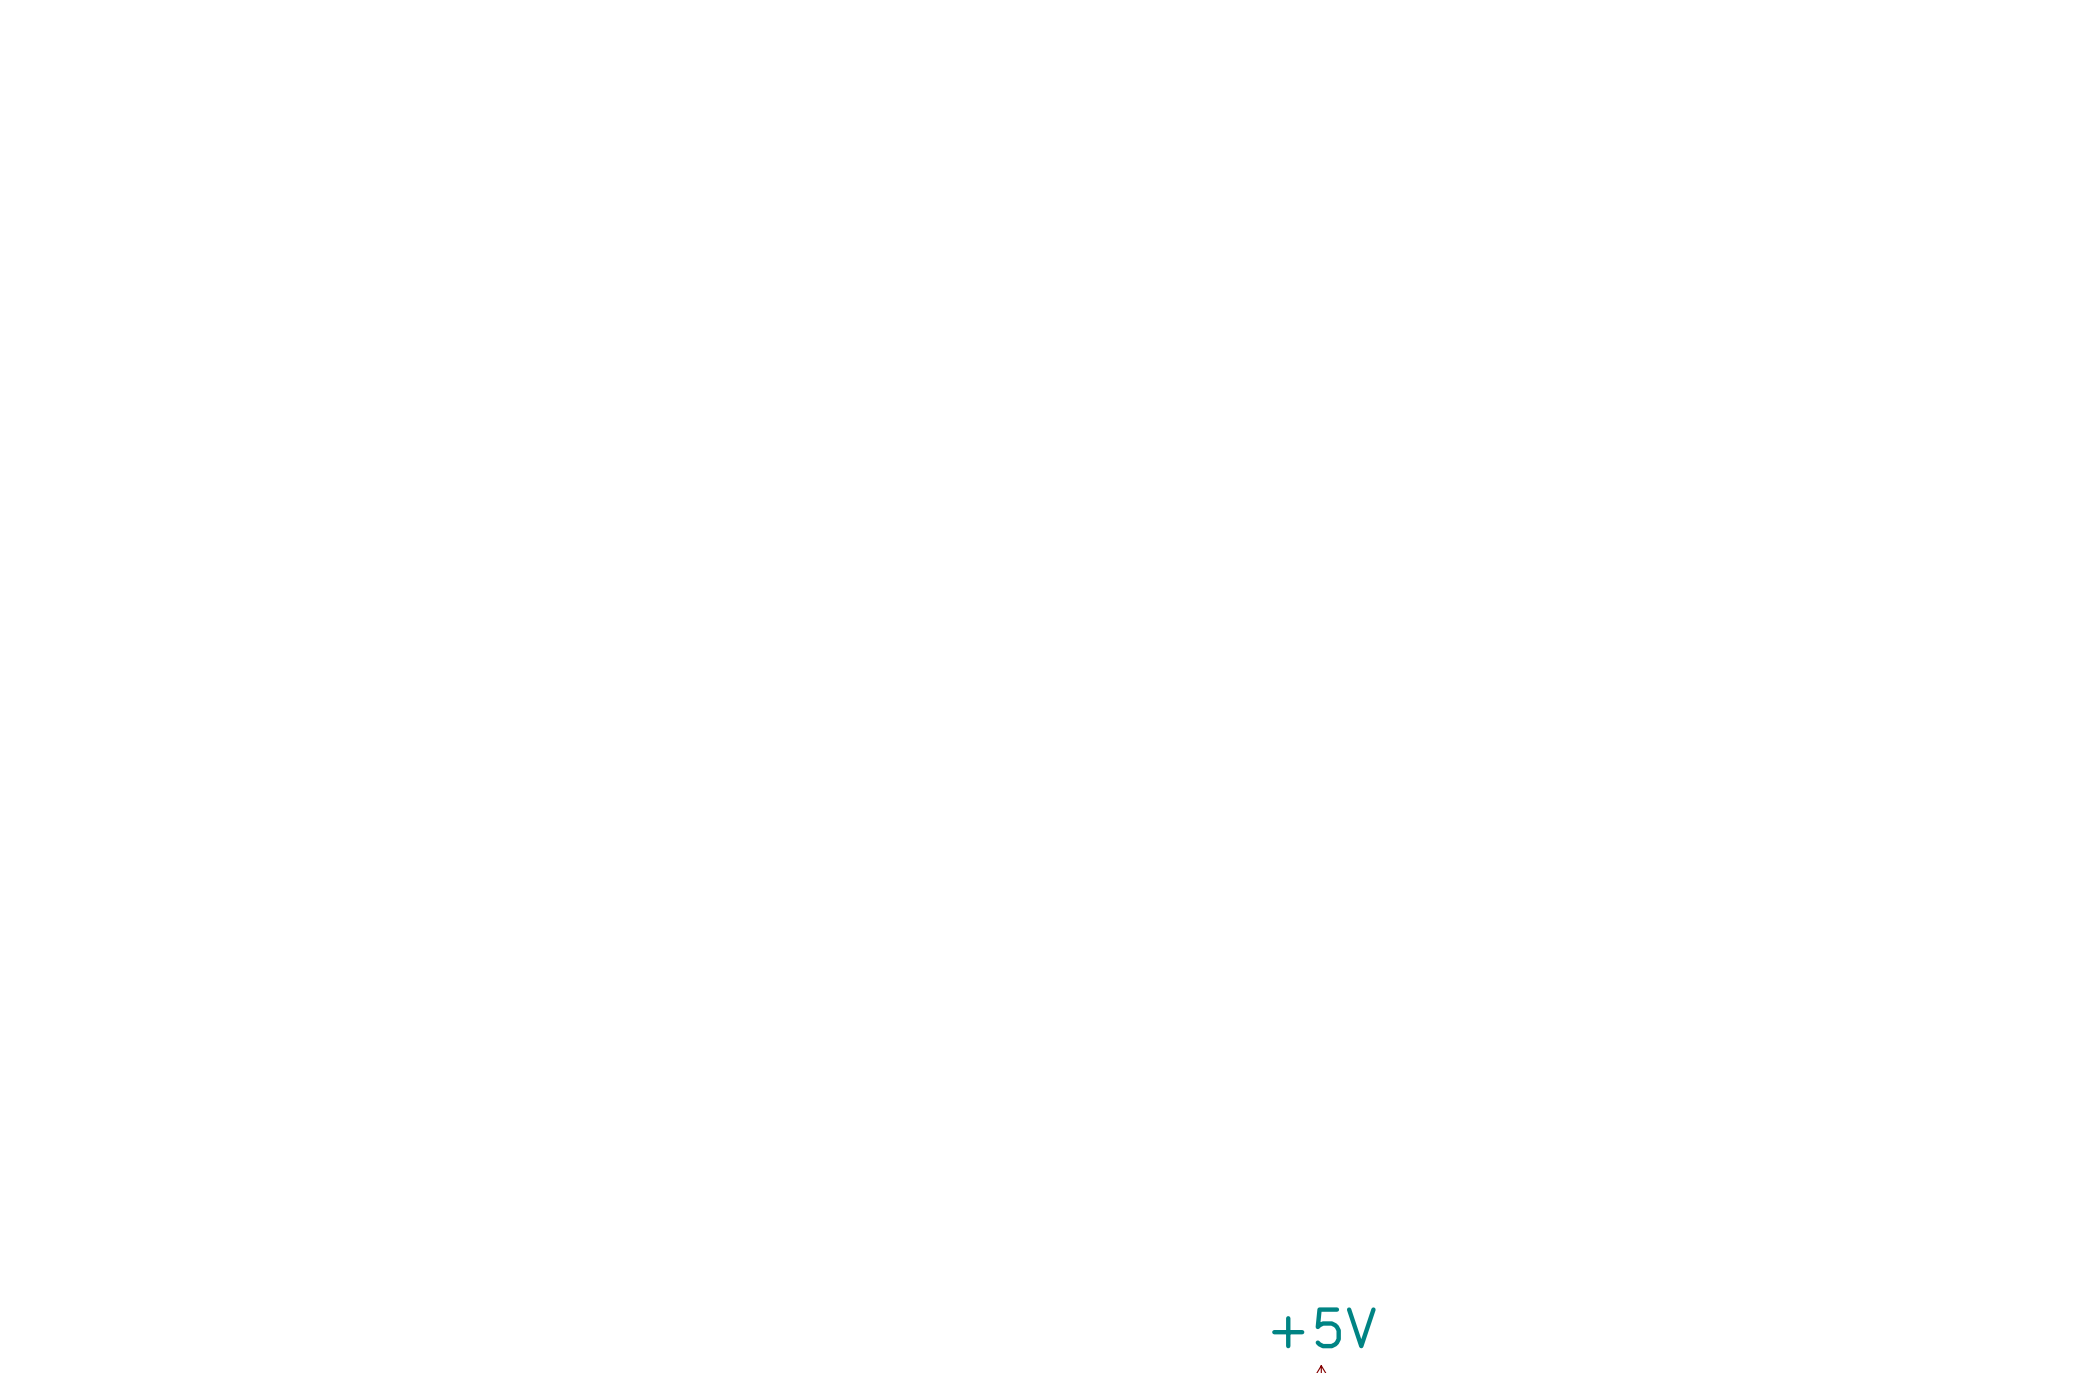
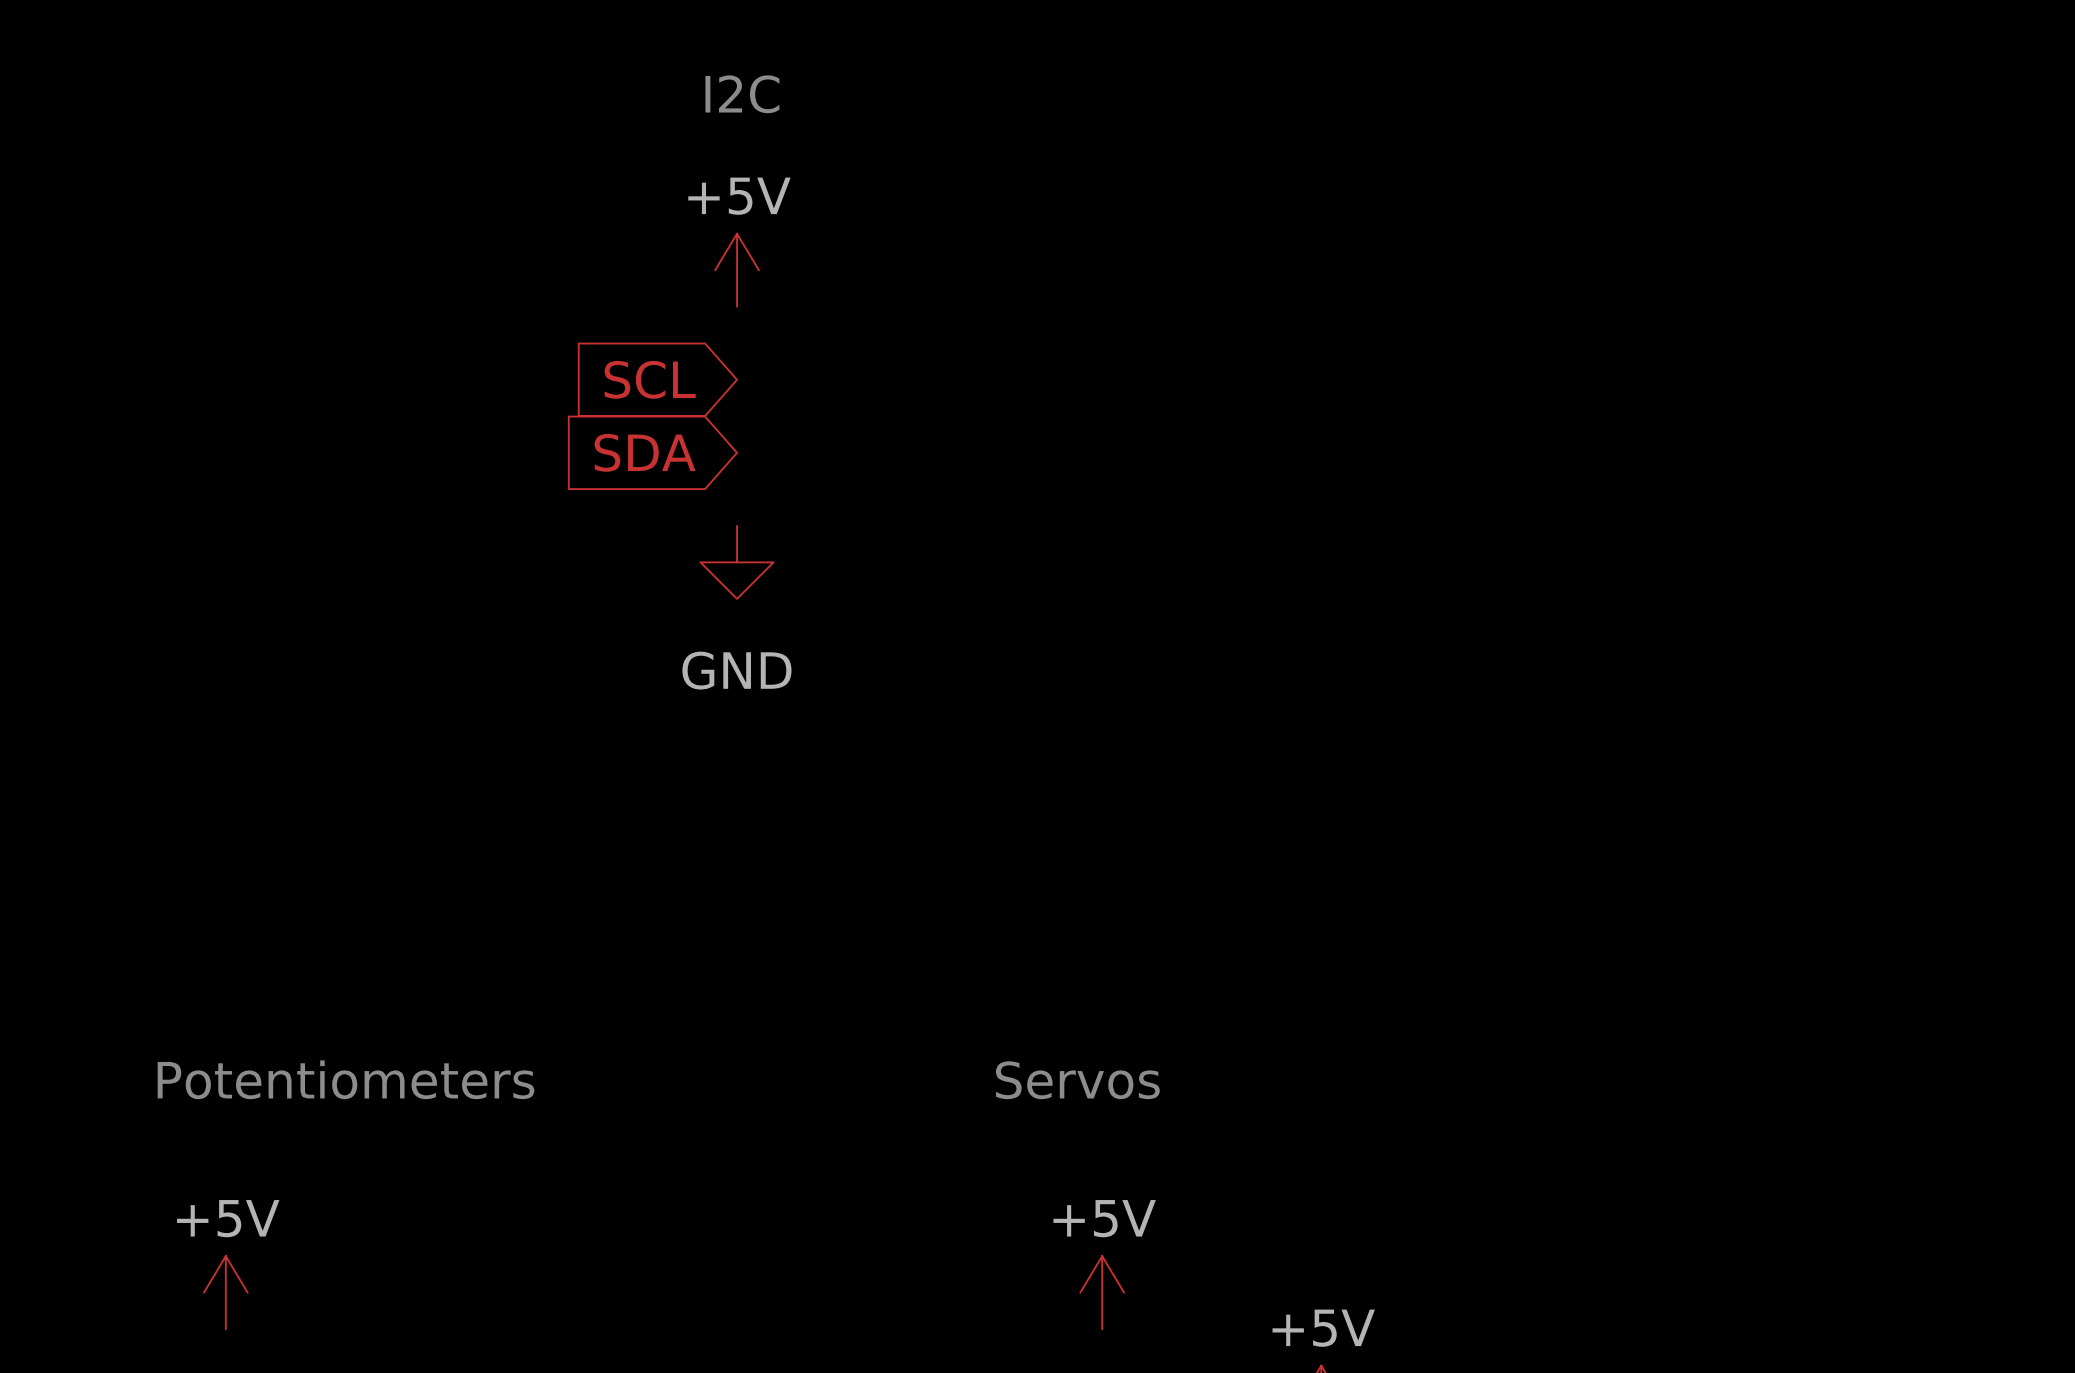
text: none -> I2C (742, 94)
power symbol: none -> +5V (737, 270)
global label: none -> SCL (650, 379)
global label: none -> SDA (645, 452)
power symbol: none -> GND (737, 562)
text: none -> Potentiometers (346, 1079)
text: none -> Servos (1077, 1080)
power symbol: none -> +5V (225, 1292)
power symbol: none -> +5V (1102, 1292)

